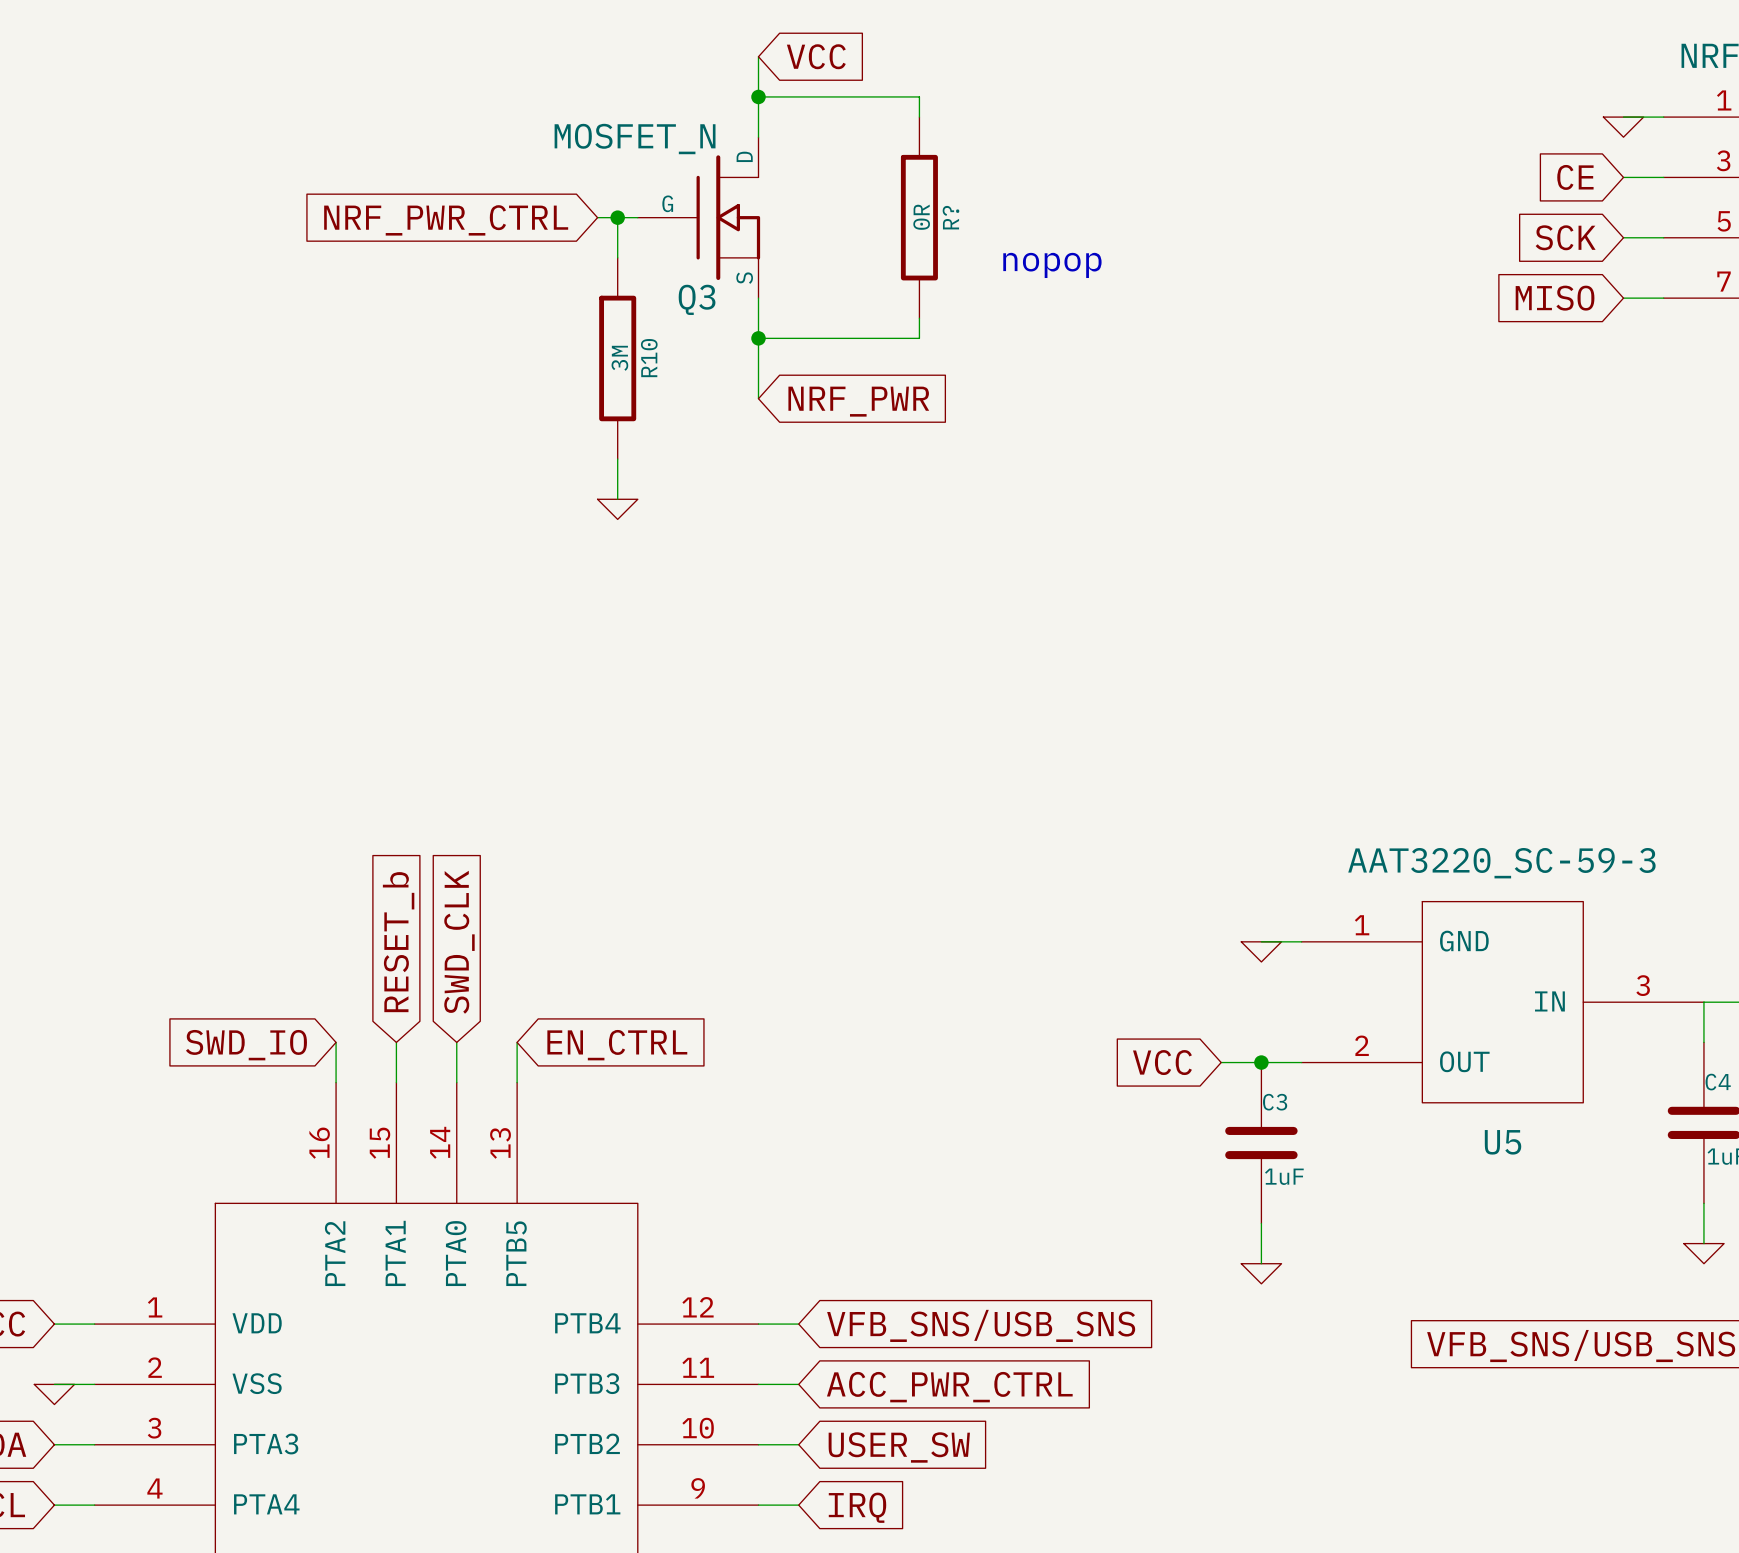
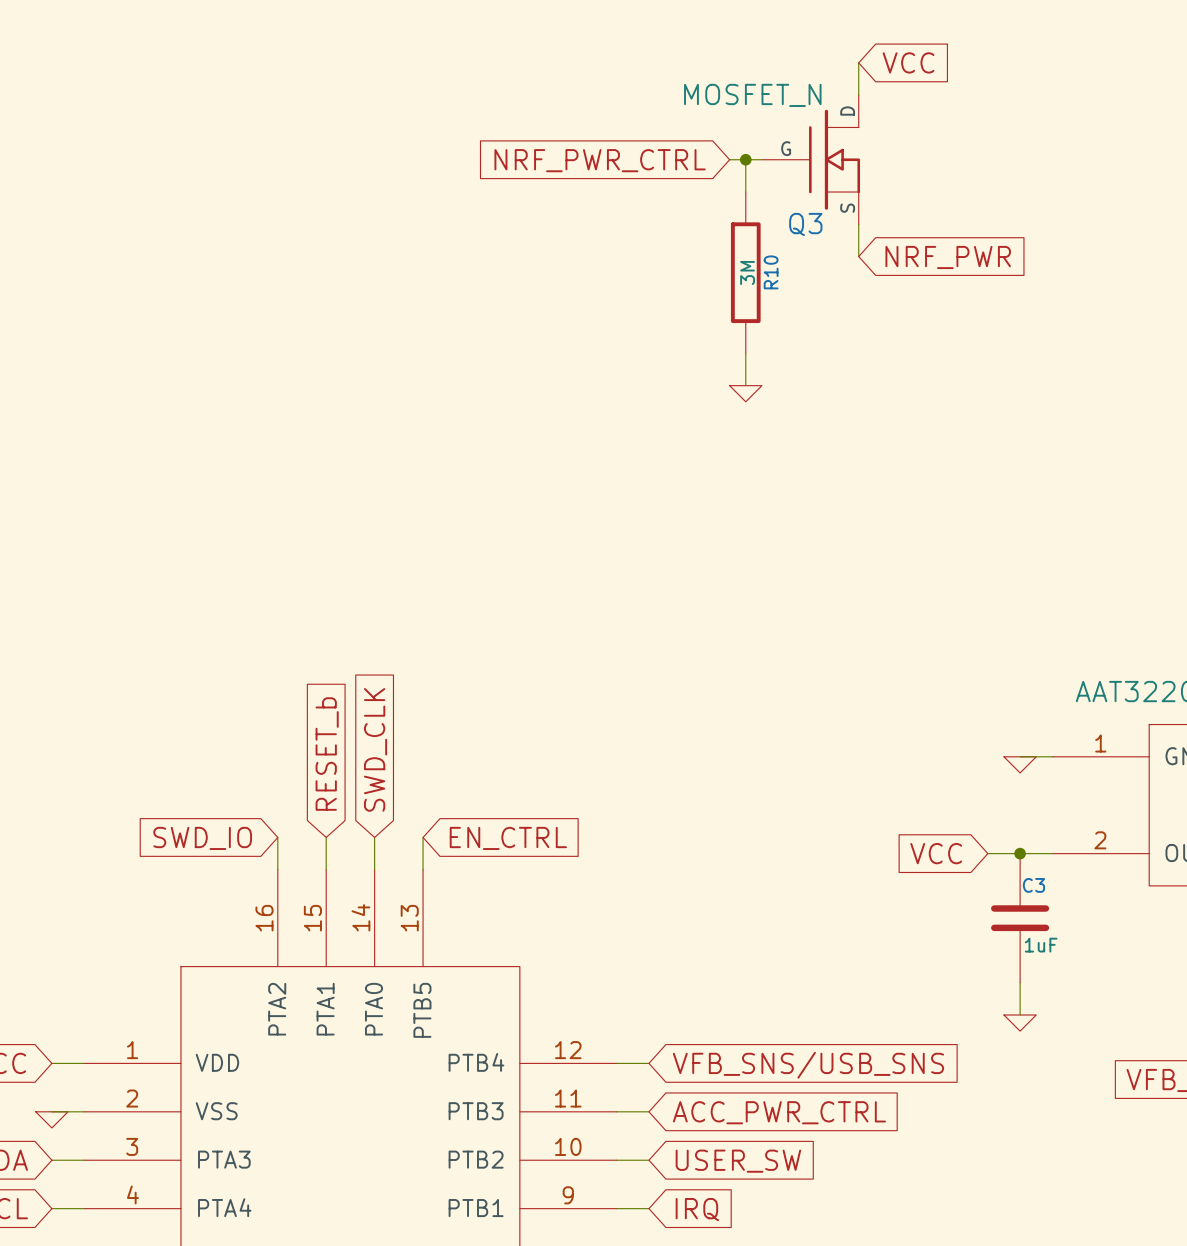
wire: (758, 56) (758, 137) -> none
global label position: VCC (816, 56) -> VCC (908, 62)
wire: none -> (858, 62) (858, 95)
wire: (758, 96) (919, 96) (919, 117) -> none
junction: (758, 96) -> none
junction: none -> (745, 159)
wire: (597, 217) (637, 217) -> (729, 159) (761, 159)
wire: (617, 217) (617, 257) -> (745, 159) (745, 192)
junction: (617, 217) -> none
Q3 position: (698, 217) -> (810, 159)
R?: 0R (919, 217) -> none
global label position: NRF_PWR_CTRL (446, 220) -> NRF_PWR_CTRL (600, 160)
text: nopop (1052, 265) -> none
wire: none -> (858, 224) (858, 256)
wire: (758, 298) (758, 398) -> none
wire: (919, 318) (919, 338) (758, 338) -> none
junction: (758, 338) -> none
R10 position: (617, 358) -> (745, 272)
global label position: NRF_PWR (858, 401) -> NRF_PWR (948, 257)
wire: (617, 459) (617, 499) -> (745, 353) (745, 385)
power symbol position: (617, 509) -> (745, 393)

